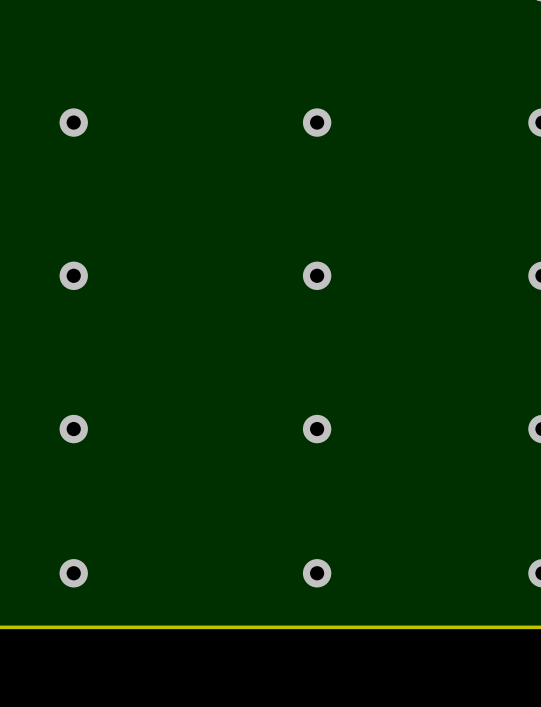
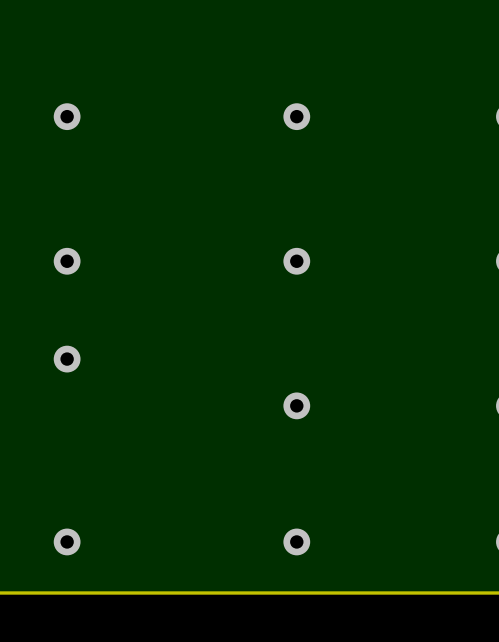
via position: (73, 429) -> (67, 359)

